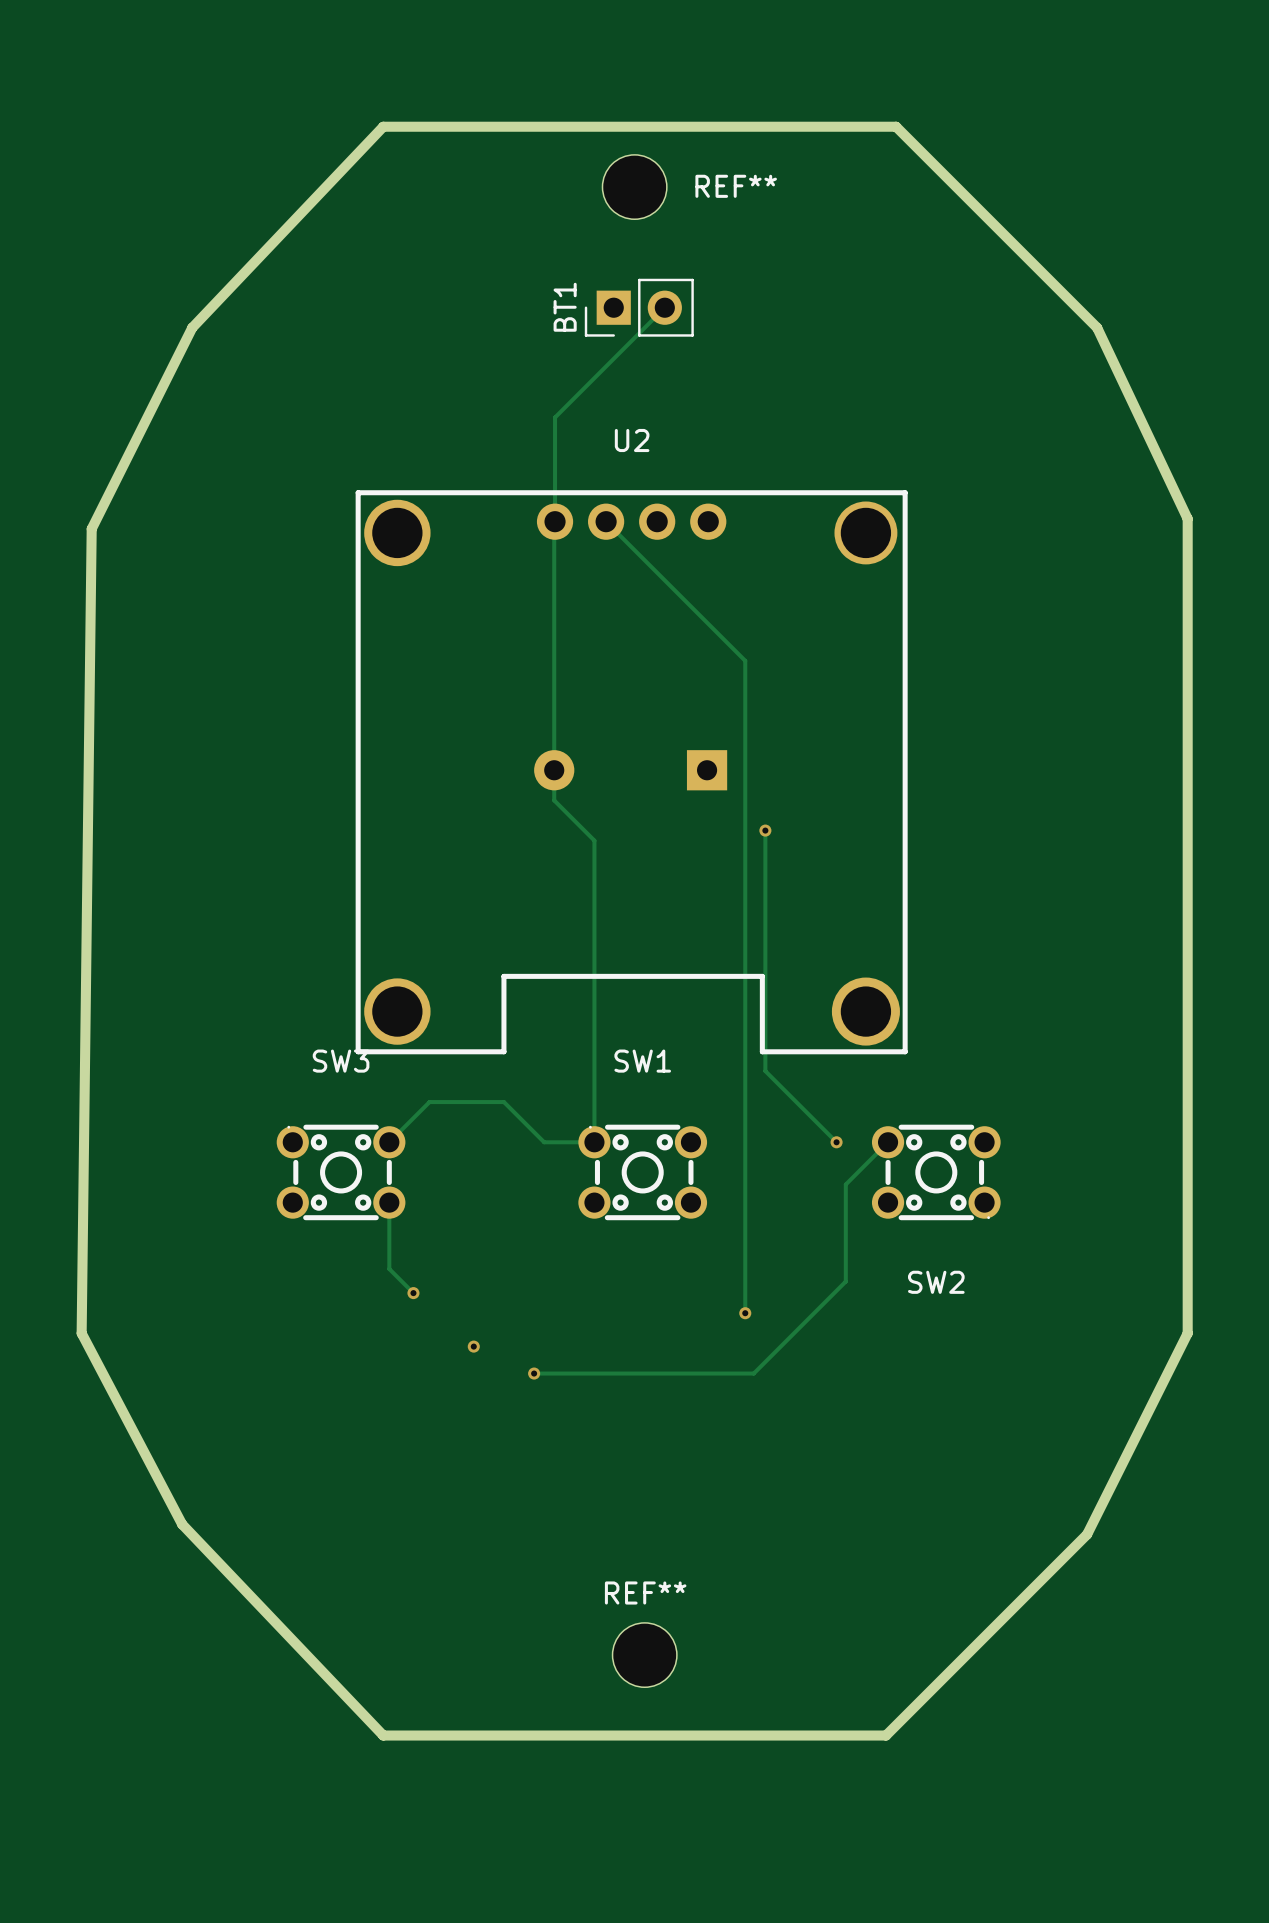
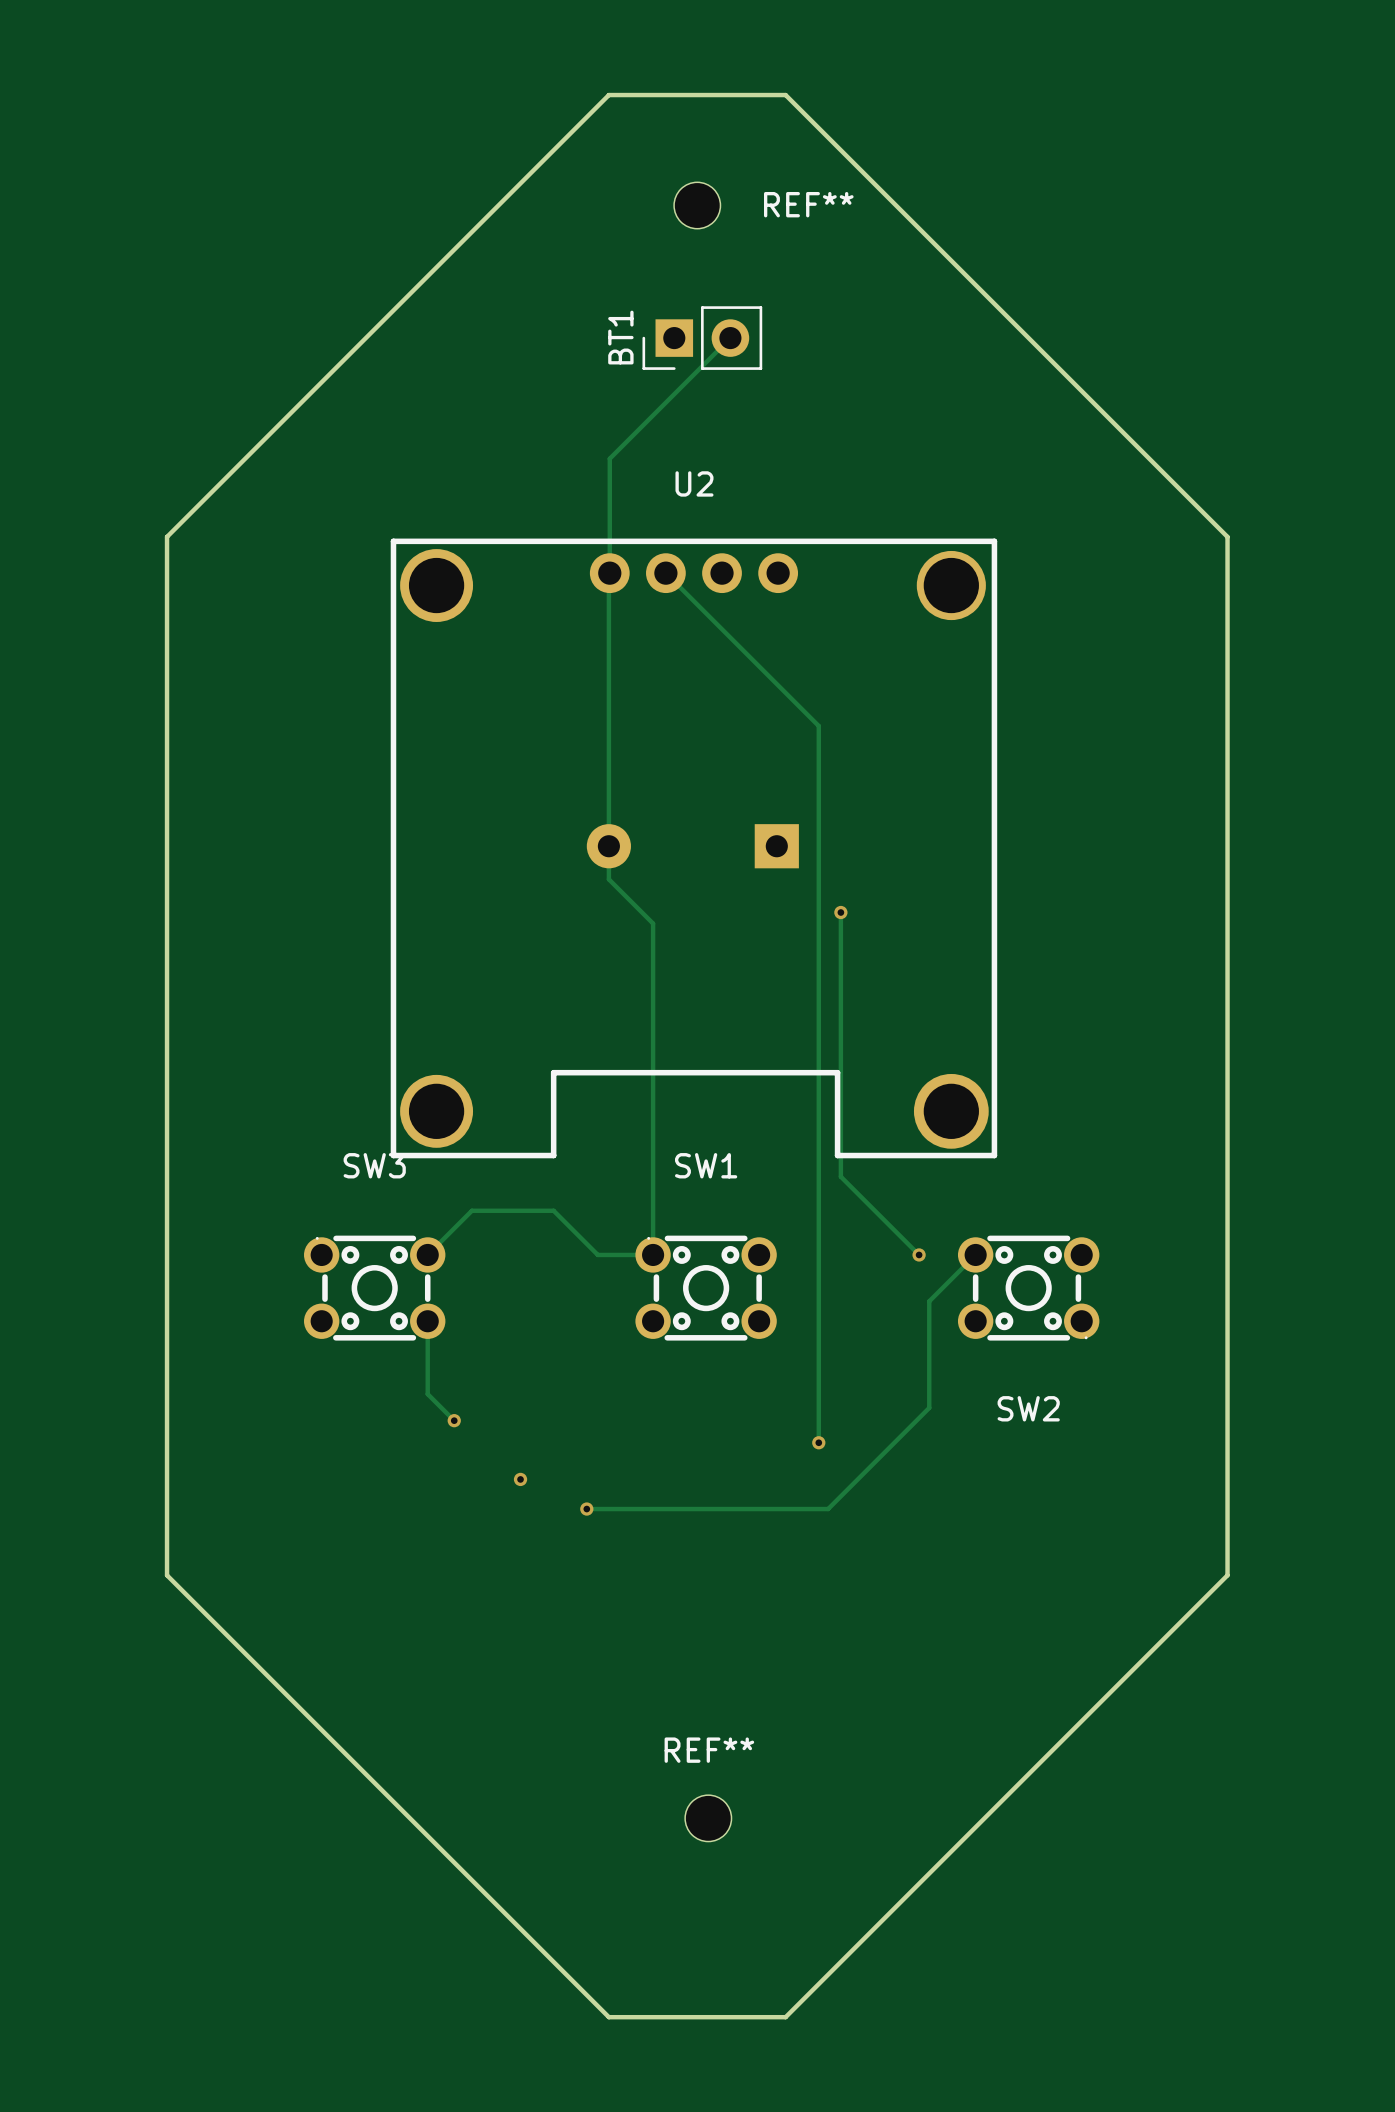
board edge: (383, 126) (896, 126) (1097, 327) (1187, 518) (1187, 1333) (1087, 1534) (886, 1735) (383, 1735) (182, 1524) (81, 1333) (91, 528) (192, 327) (383, 126) -> (608, 95) (167, 536) (167, 1575) (608, 2017) (785, 2017) (1227, 1575) (1227, 536) (785, 95) (608, 95)
REF** footprint: [602, 154, 667, 220] -> [674, 182, 721, 229]
REF** footprint: [612, 1622, 677, 1688] -> [685, 1795, 732, 1842]

